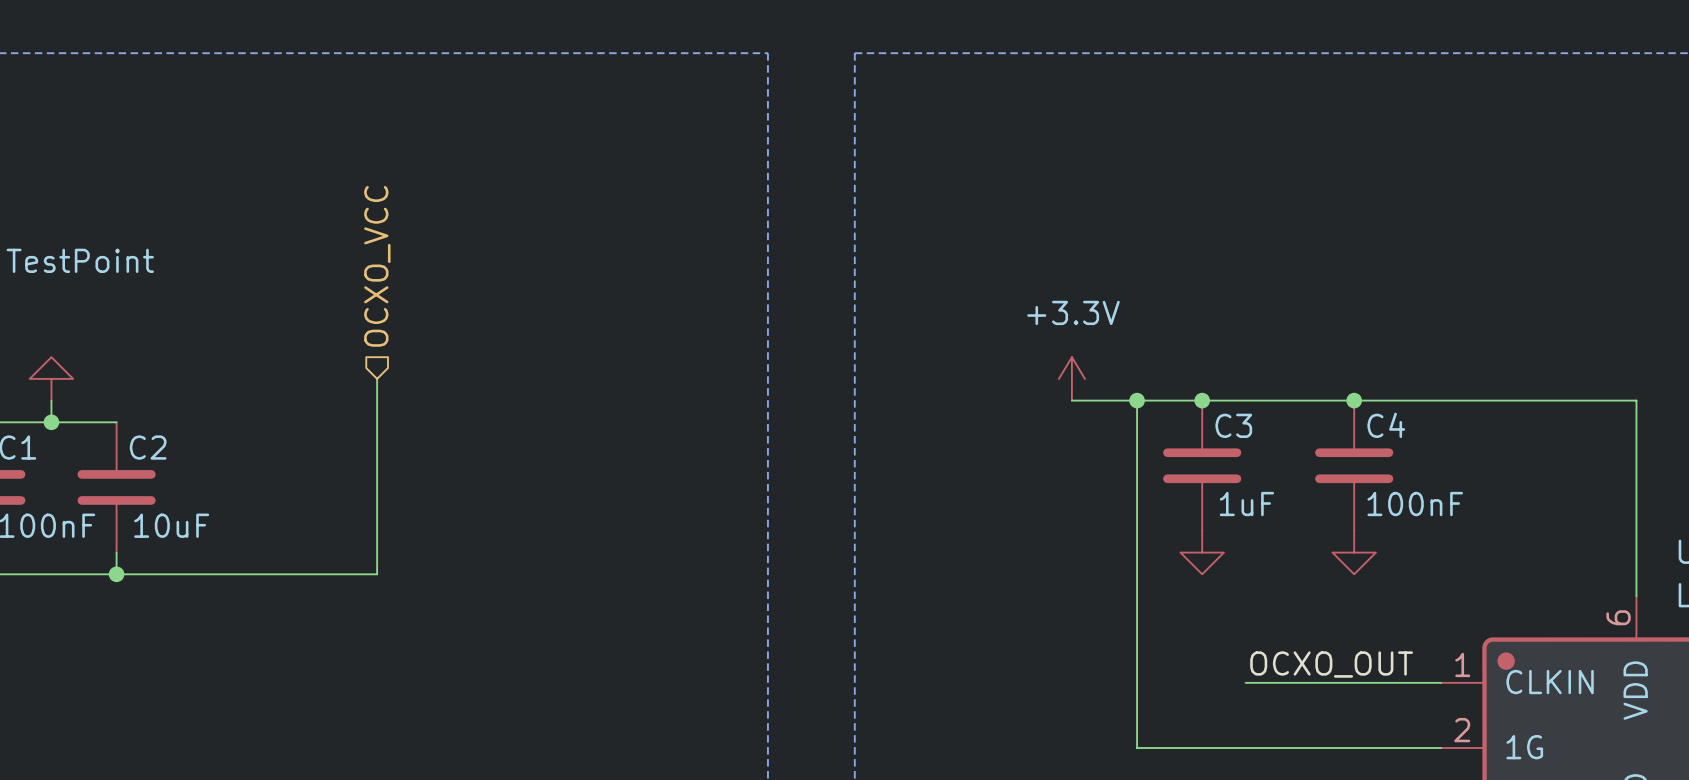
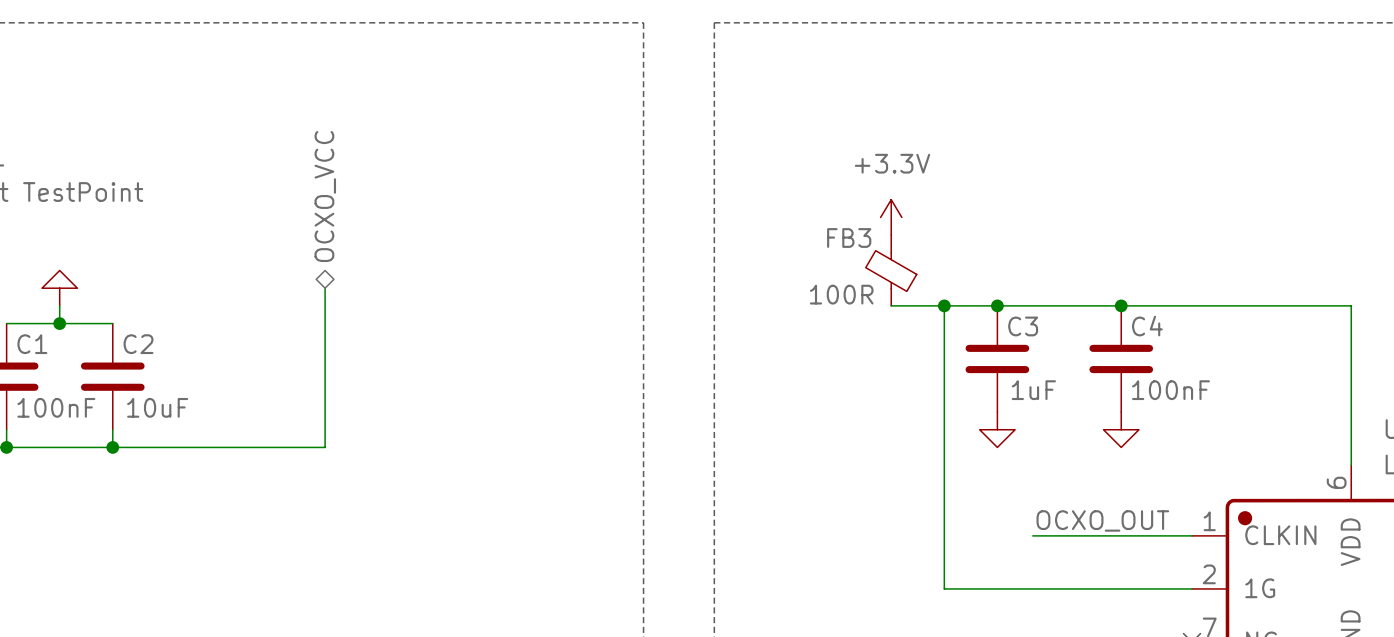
hierarchical label shape: input (377, 266) -> bidirectional (325, 196)
FB3: none -> 100R (891, 270)
power symbol position: +3.3V (1071, 378) -> +3.3V (891, 217)

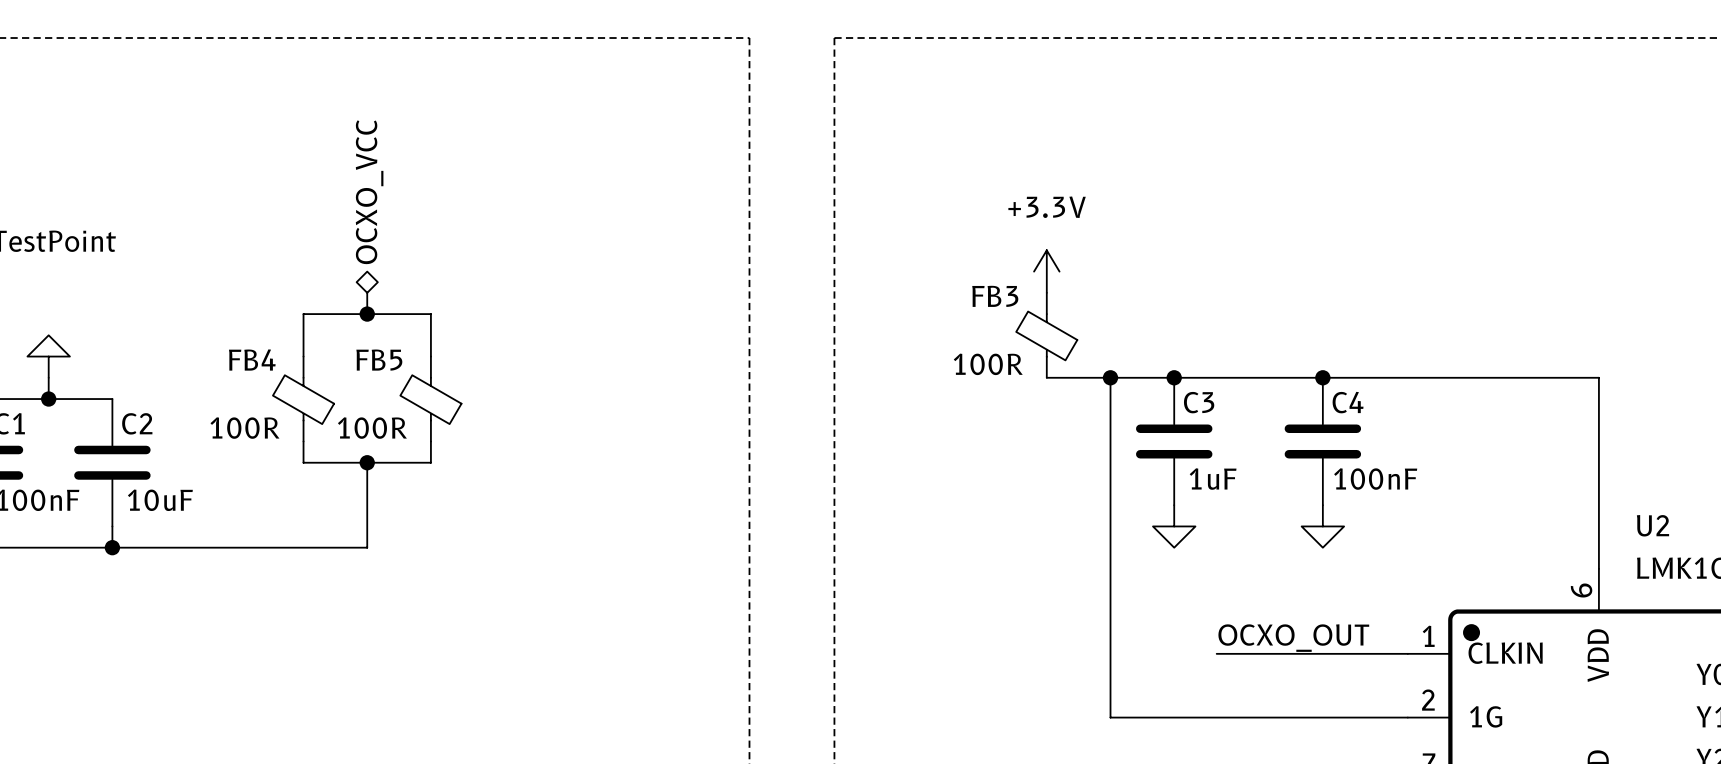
hierarchical label position: OCXO_VCC (325, 196) -> OCXO_VCC (369, 192)
wire: none -> (367, 292) (367, 314)
junction: none -> (367, 314)
wire: none -> (303, 356) (303, 314) (430, 314) (430, 356)
wire: (325, 288) (325, 376) -> none
FB4: none -> 100R (303, 399)
FB5: none -> 100R (430, 399)
wire: none -> (303, 441) (303, 462) (430, 462) (430, 441)
junction: none -> (367, 462)

